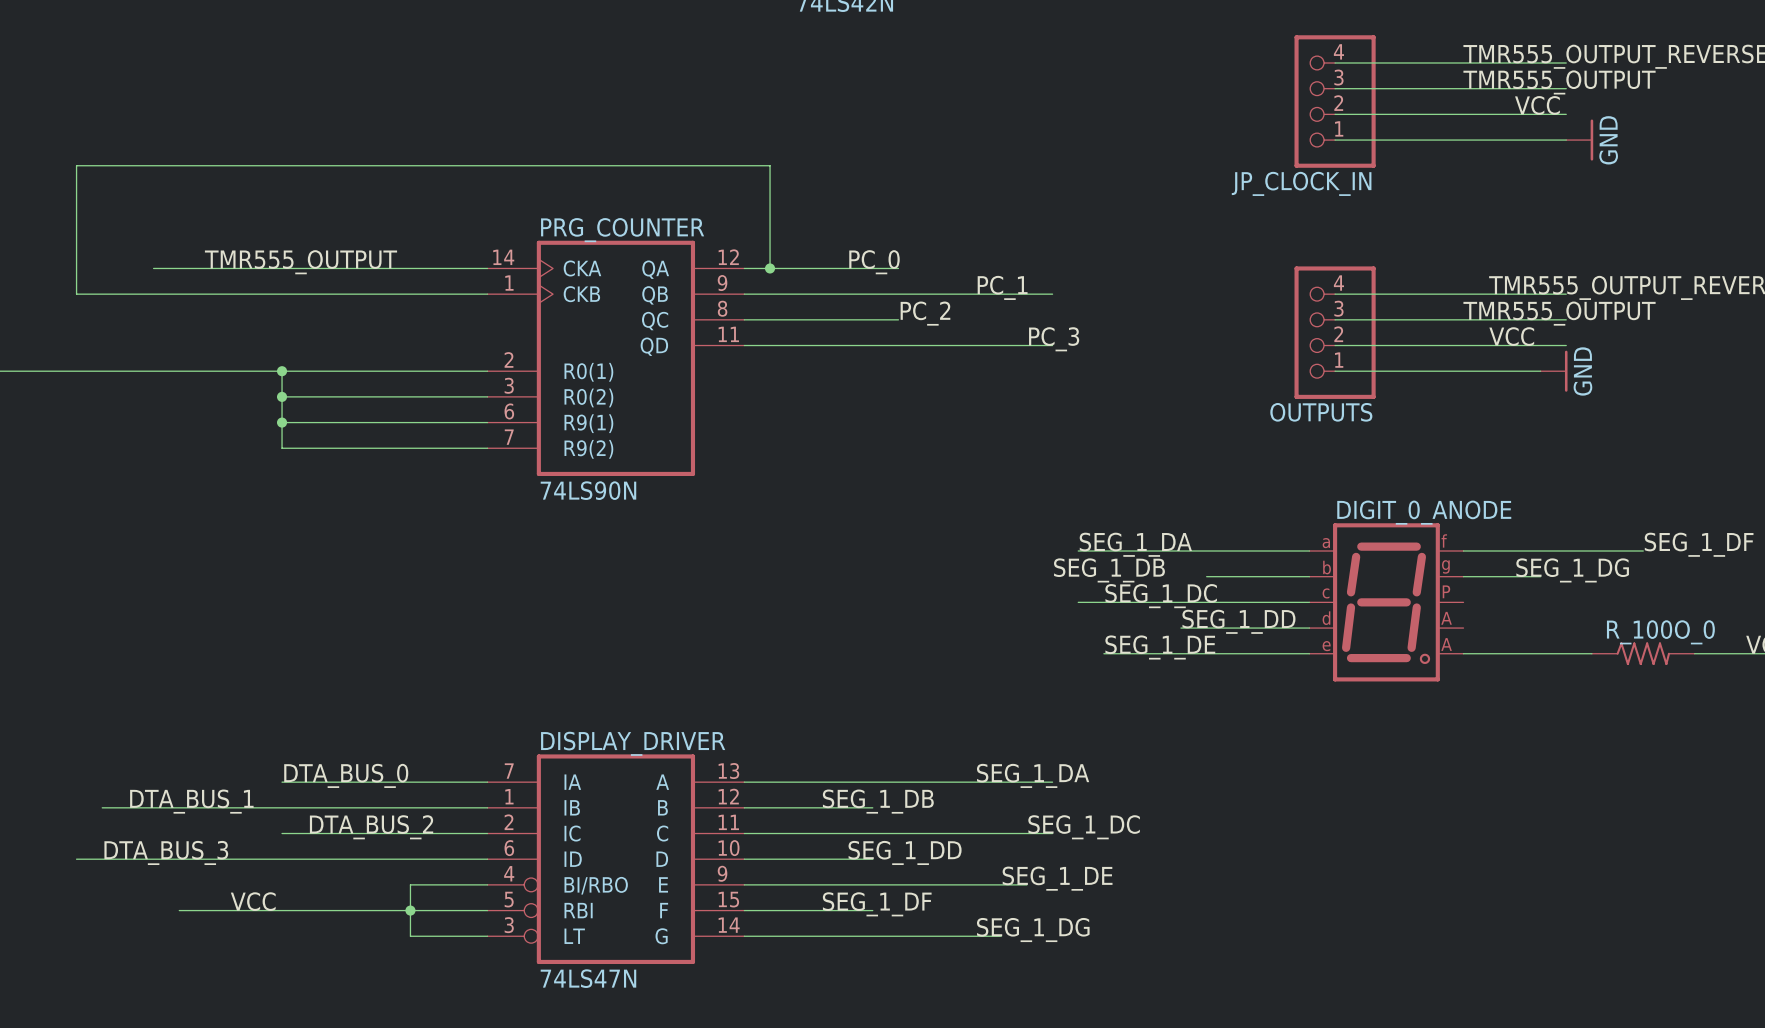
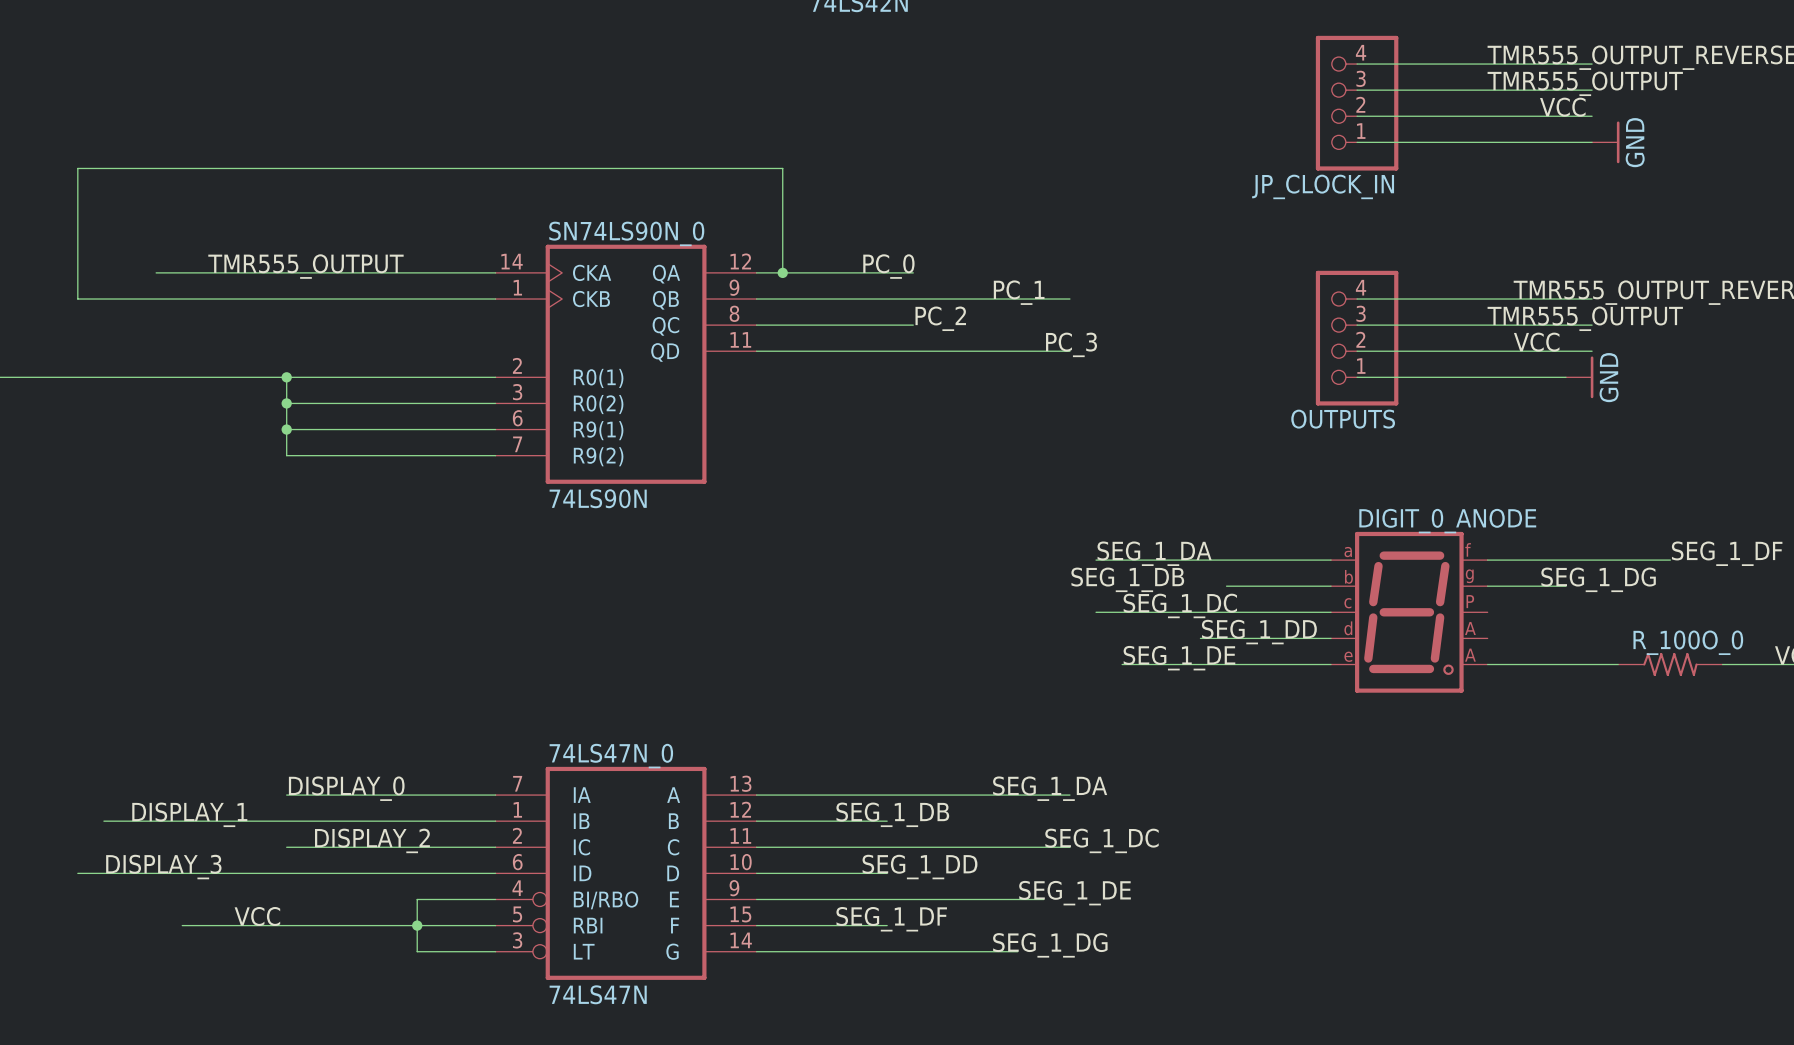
PRG_COUNTER name: PRG_COUNTER (622, 230) -> SN74LS90N_0 (626, 233)
DISPLAY_DRIVER name: DISPLAY_DRIVER (633, 743) -> 74LS47N_0 (611, 756)
label: DTA_BUS_0 (346, 775) -> DISPLAY_0 (346, 788)
label: DTA_BUS_1 (191, 801) -> DISPLAY_1 (189, 814)
label: DTA_BUS_2 (371, 827) -> DISPLAY_2 (372, 840)
label: DTA_BUS_3 (166, 852) -> DISPLAY_3 (163, 867)

